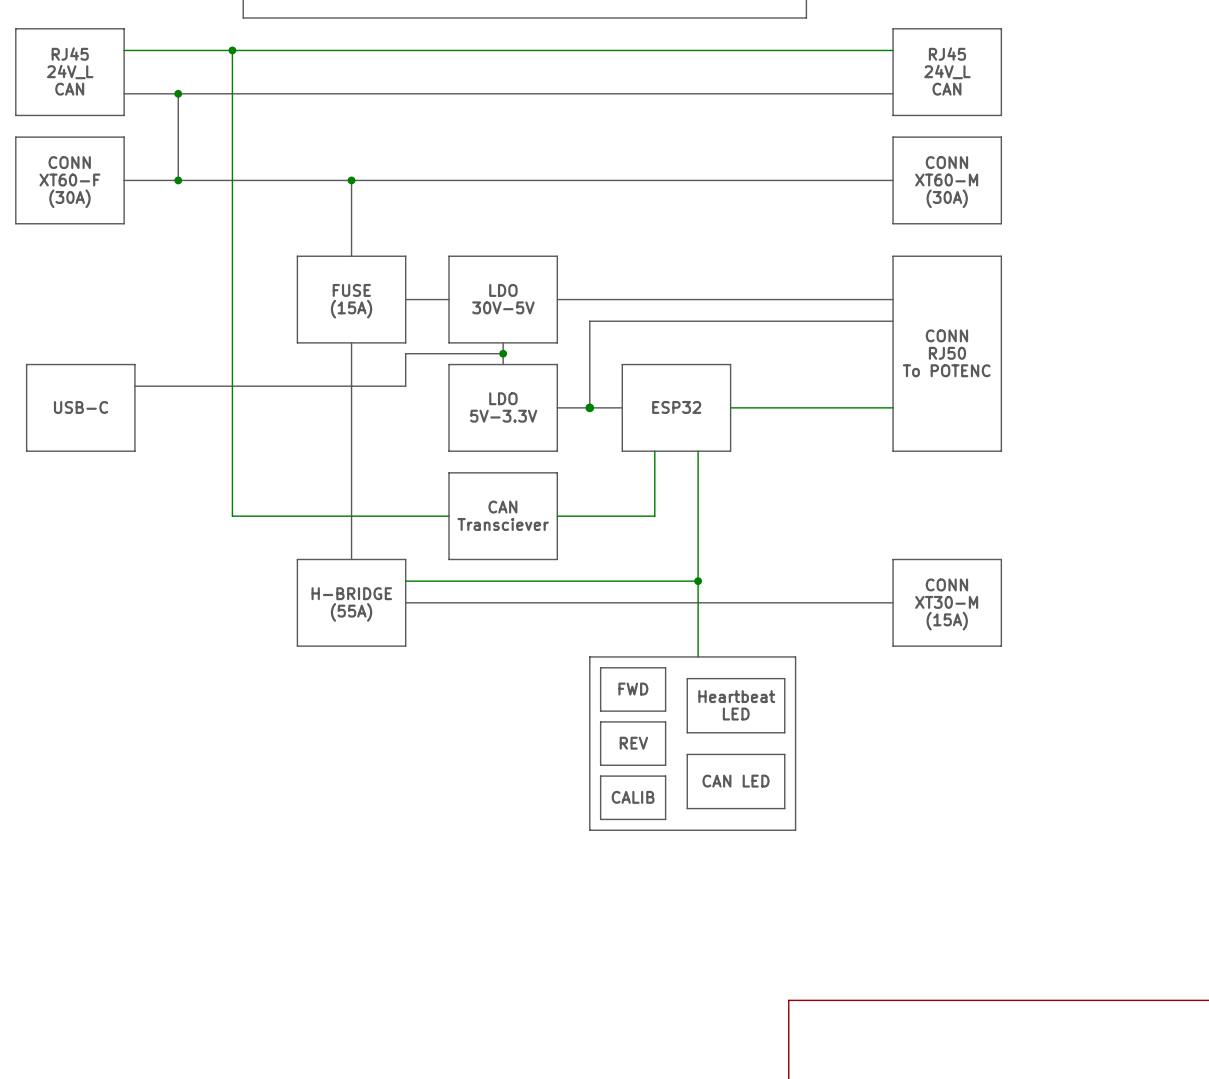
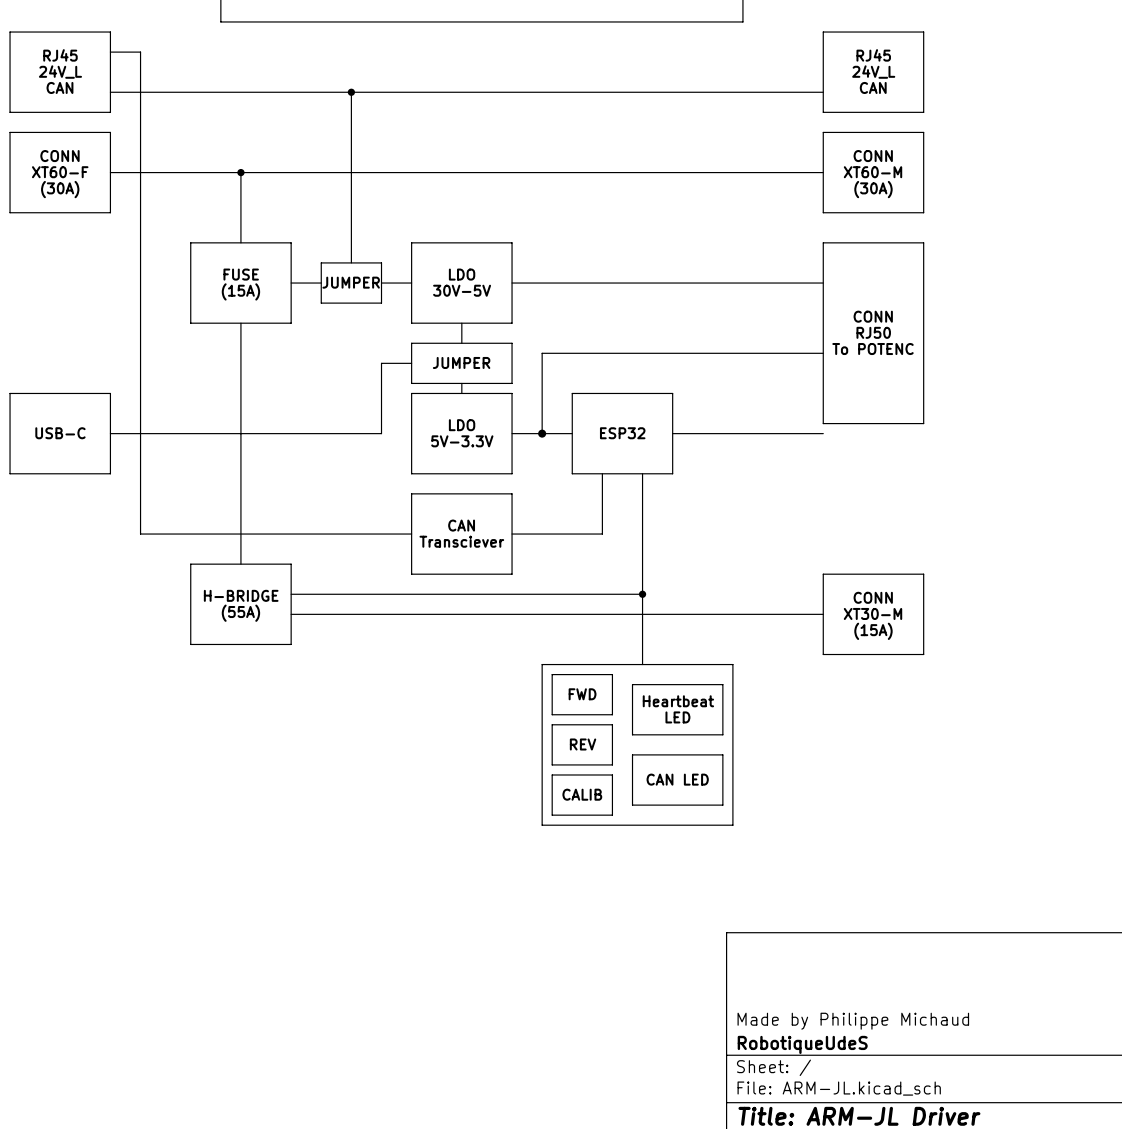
wire: (156, 50) (893, 50) -> (140, 52) (140, 534) (411, 534)
wire: (232, 50) (232, 516) (449, 516) -> none
junction: (232, 50) -> none
bus: (178, 93) (178, 180) -> none
junction: (178, 93) -> none
bus: none -> (351, 92) (351, 262)
junction: none -> (351, 92)
junction: (178, 180) -> none
junction: none -> (240, 172)
bus: (351, 180) (351, 256) -> (240, 172) (240, 242)
junction: (351, 180) -> none
line: (297, 256) (297, 342) -> (271, 242) (190, 242) (190, 323) (271, 323)
line: (319, 256) (405, 256) (405, 342) (319, 342) -> (291, 242) (291, 323)
line: none -> (321, 262) (381, 262) (381, 303) (321, 303) (321, 262)
text position: FUSE (351, 290) -> FUSE (241, 274)
bus: none -> (291, 283) (321, 283)
text: none -> JUMPER (351, 282)
bus: (405, 299) (416, 299) -> none
text position: (15A) (351, 309) -> (15A) (240, 291)
bus: (893, 321) (589, 321) (589, 375) -> (823, 353) (542, 353)
bus: none -> (240, 323) (240, 564)
bus: (351, 342) (351, 559) -> none
bus: (503, 353) (405, 353) (405, 386) (134, 386) -> none
junction: (503, 353) -> none
line: (26, 364) (134, 364) (134, 451) (26, 451) (26, 364) -> (10, 393) (110, 393) (110, 473) (10, 473) (10, 393)
text: none -> JUMPER (461, 362)
bus: none -> (411, 363) (381, 363) (381, 433) (110, 433)
text position: LDO (503, 398) -> LDO (462, 425)
text position: USB-C (81, 407) -> USB-C (60, 433)
line: (449, 407) (449, 418) -> (411, 383) (512, 383)
bus: none -> (461, 383) (461, 393)
bus: (557, 407) (622, 407) -> (512, 433) (572, 433)
line: (557, 407) (557, 418) -> (411, 393) (512, 393)
bus: none -> (542, 383) (542, 433)
junction: (589, 407) -> none
text position: ESP32 (676, 407) -> ESP32 (622, 433)
wire: (730, 407) (893, 407) -> (672, 433) (823, 433)
text position: 5V-3.3V (503, 416) -> 5V-3.3V (462, 441)
line: (622, 418) (622, 364) (730, 364) (730, 418) -> (572, 393) (672, 393)
line: (449, 451) (557, 451) -> (411, 423) (411, 443)
line: (622, 451) (730, 451) -> (572, 423) (572, 473) (672, 473) (672, 423)
wire: (654, 451) (654, 505) -> none
wire: (698, 451) (698, 505) -> (642, 614) (642, 664)
junction: none -> (542, 433)
line: (449, 472) (557, 472) -> (512, 423) (512, 443)
line: (449, 505) (449, 527) -> (411, 473) (512, 473)
line: (557, 505) (557, 527) -> (411, 493) (512, 493)
text position: CAN (502, 507) -> CAN (461, 525)
wire: (557, 516) (654, 516) -> (512, 534) (602, 534) (602, 483)
text position: Transciever (503, 524) -> Transciever (461, 541)
line: (297, 559) (297, 646) (405, 646) (405, 559) (297, 559) -> (190, 564) (190, 644) (291, 644) (291, 564) (190, 564)
line: (449, 559) (557, 559) -> (411, 523) (411, 574) (512, 574) (512, 523)
wire: (405, 581) (698, 581) -> none
junction: (698, 581) -> none
text position: CONN (946, 584) -> CONN (873, 597)
text position: H-BRIDGE (351, 593) -> H-BRIDGE (241, 595)
bus: (405, 602) (893, 602) -> none
text position: XT30-M (946, 602) -> XT30-M (872, 613)
text position: (55A) (351, 612) -> (55A) (240, 613)
line: (893, 613) (893, 559) (1001, 559) (1001, 613) -> (823, 574) (923, 574)
text position: (15A) (947, 621) -> (15A) (873, 631)
wire: none -> (291, 594) (642, 594)
junction: none -> (642, 594)
line: (893, 646) (1001, 646) -> (823, 604) (823, 654) (923, 654) (923, 604)
bus: none -> (291, 614) (823, 614)
text: FWD (633, 689) -> none
text position: Heartbeat (736, 696) -> Heartbeat (678, 701)
line: (589, 711) (589, 656) (795, 656) (795, 711) -> (612, 664) (732, 664)
line: (600, 711) (600, 667) (665, 667) (665, 711) -> (552, 664) (542, 664)
text position: LED (736, 714) -> LED (677, 717)
line: (687, 732) (687, 678) (784, 678) (784, 732) -> (632, 684) (632, 704)
text: REV (633, 743) -> FWD (582, 694)
line: (687, 754) (784, 754) -> (722, 684) (722, 704)
text position: CAN LED (736, 781) -> CAN LED (677, 779)
line: (687, 786) (687, 808) -> (632, 734) (722, 734)
line: (784, 786) (784, 808) -> (632, 754) (632, 805) (722, 805) (722, 754)
text: CALIB (633, 797) -> REV (583, 744)
line: (589, 830) (600, 830) -> (612, 774) (612, 815) (552, 815) (552, 774)
line: (665, 830) (795, 830) -> (542, 774) (542, 825) (732, 825) (732, 774)
text: none -> CALIB (582, 794)

